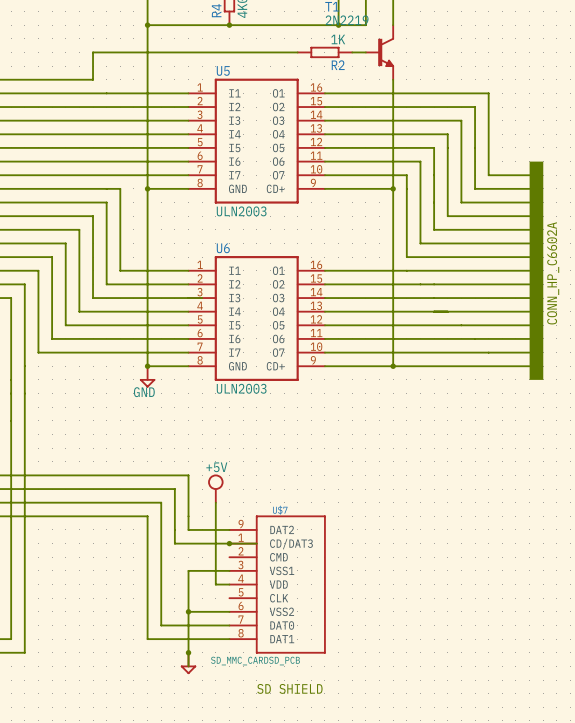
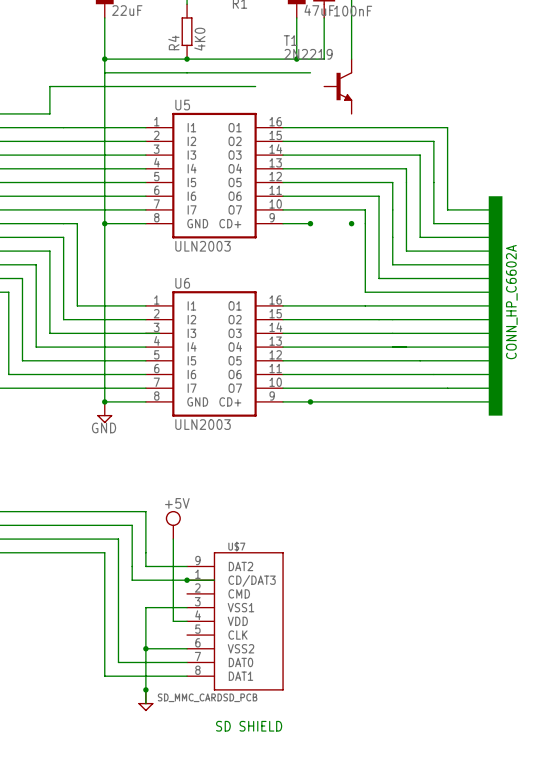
wire: none -> (104, 72) (310, 72)
R2: 1K (324, 52) -> none
wire: (352, 52) (365, 52) -> none
wire: (393, 79) (393, 366) -> none
wire: (352, 188) (393, 188) -> none
junction: none -> (310, 223)
junction: none -> (310, 401)
junction: (393, 366) -> none

